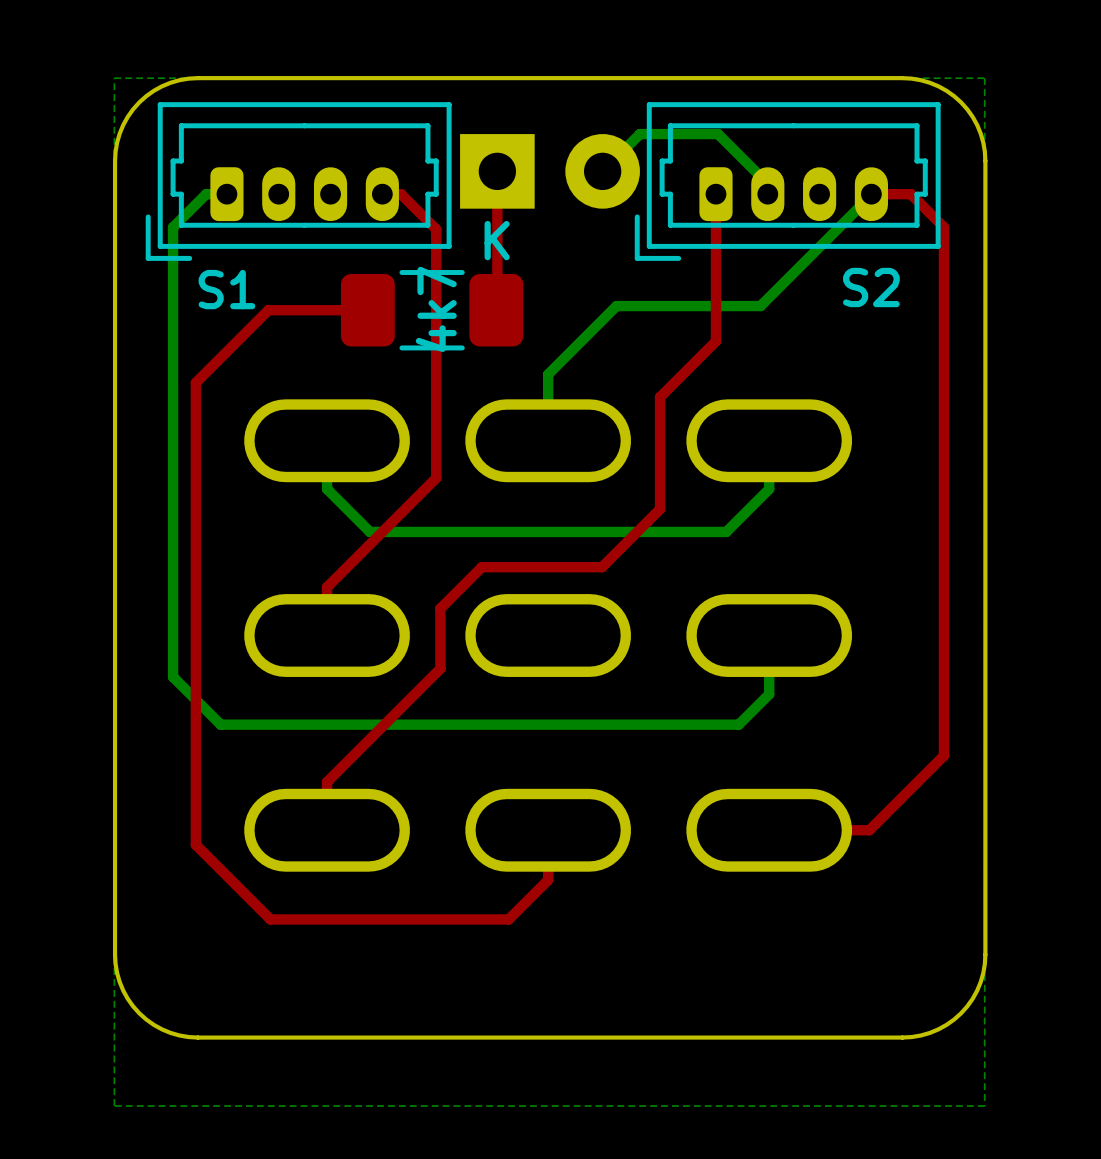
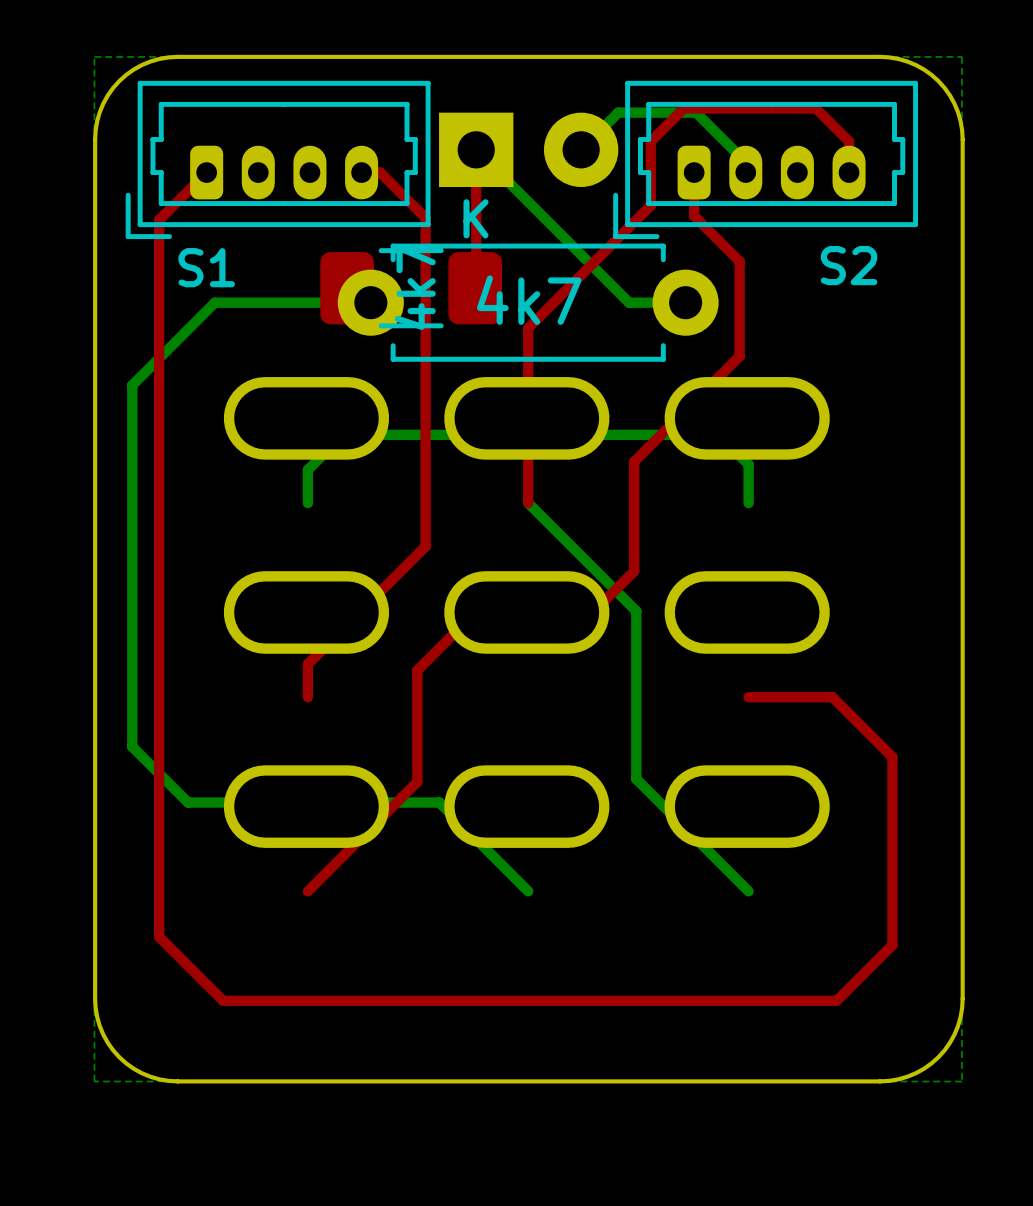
bottom track: none -> (476, 149) (629, 302) (685, 302)
bottom track: (226, 194) (206, 194) (173, 227) (173, 677) (220, 724) (738, 724) (769, 694) (769, 635) -> none
top track: none -> (206, 172) (159, 220) (159, 936) (223, 1000) (836, 1000) (892, 945) (892, 757) (832, 697) (748, 697)
top track: (871, 194) (910, 194) (943, 227) (943, 755) (869, 830) (769, 830) -> (849, 172) (849, 141) (816, 108) (683, 108) (650, 141) (650, 205) (528, 328) (528, 503)
bottom track: (871, 195) (760, 306) (616, 306) (548, 374) (548, 440) -> none
top track: (436, 229) (436, 478) (327, 587) (327, 635) -> (415, 207) (425, 217) (425, 546) (307, 664) (307, 697)
top track: (715, 237) (715, 341) (660, 397) (660, 509) (602, 567) (481, 567) (440, 608) (440, 668) (327, 782) (327, 830) -> (694, 215) (739, 261) (739, 356) (634, 461) (634, 571) (592, 612) (475, 612) (417, 670) (417, 781) (307, 891)
top track: (367, 310) (268, 310) (195, 382) (195, 844) (270, 919) (508, 919) (548, 880) (548, 830) -> none
bottom track: none -> (370, 302) (214, 302) (132, 385) (132, 746) (188, 802) (439, 802) (528, 891)
part: none -> 4k7 (528, 302)
bottom track: (327, 440) (327, 489) (369, 531) (726, 531) (769, 489) (769, 440) -> none
bottom track: none -> (307, 503) (307, 470) (342, 434) (718, 434) (748, 464) (748, 503)
bottom track: none -> (528, 503) (636, 611) (636, 779) (748, 891)
board edge: (115, 954) (117, 973) (123, 990) (139, 1013) (161, 1029) (179, 1035) (197, 1037) (911, 1037) (938, 1029) (954, 1019) (967, 1006) (980, 982) (985, 954) -> (95, 930) (95, 1008) (103, 1034) (119, 1057) (133, 1068) (159, 1079) (177, 1081) (880, 1081) (898, 1079) (915, 1073) (931, 1063) (944, 1050) (954, 1034) (962, 1008) (962, 930)

